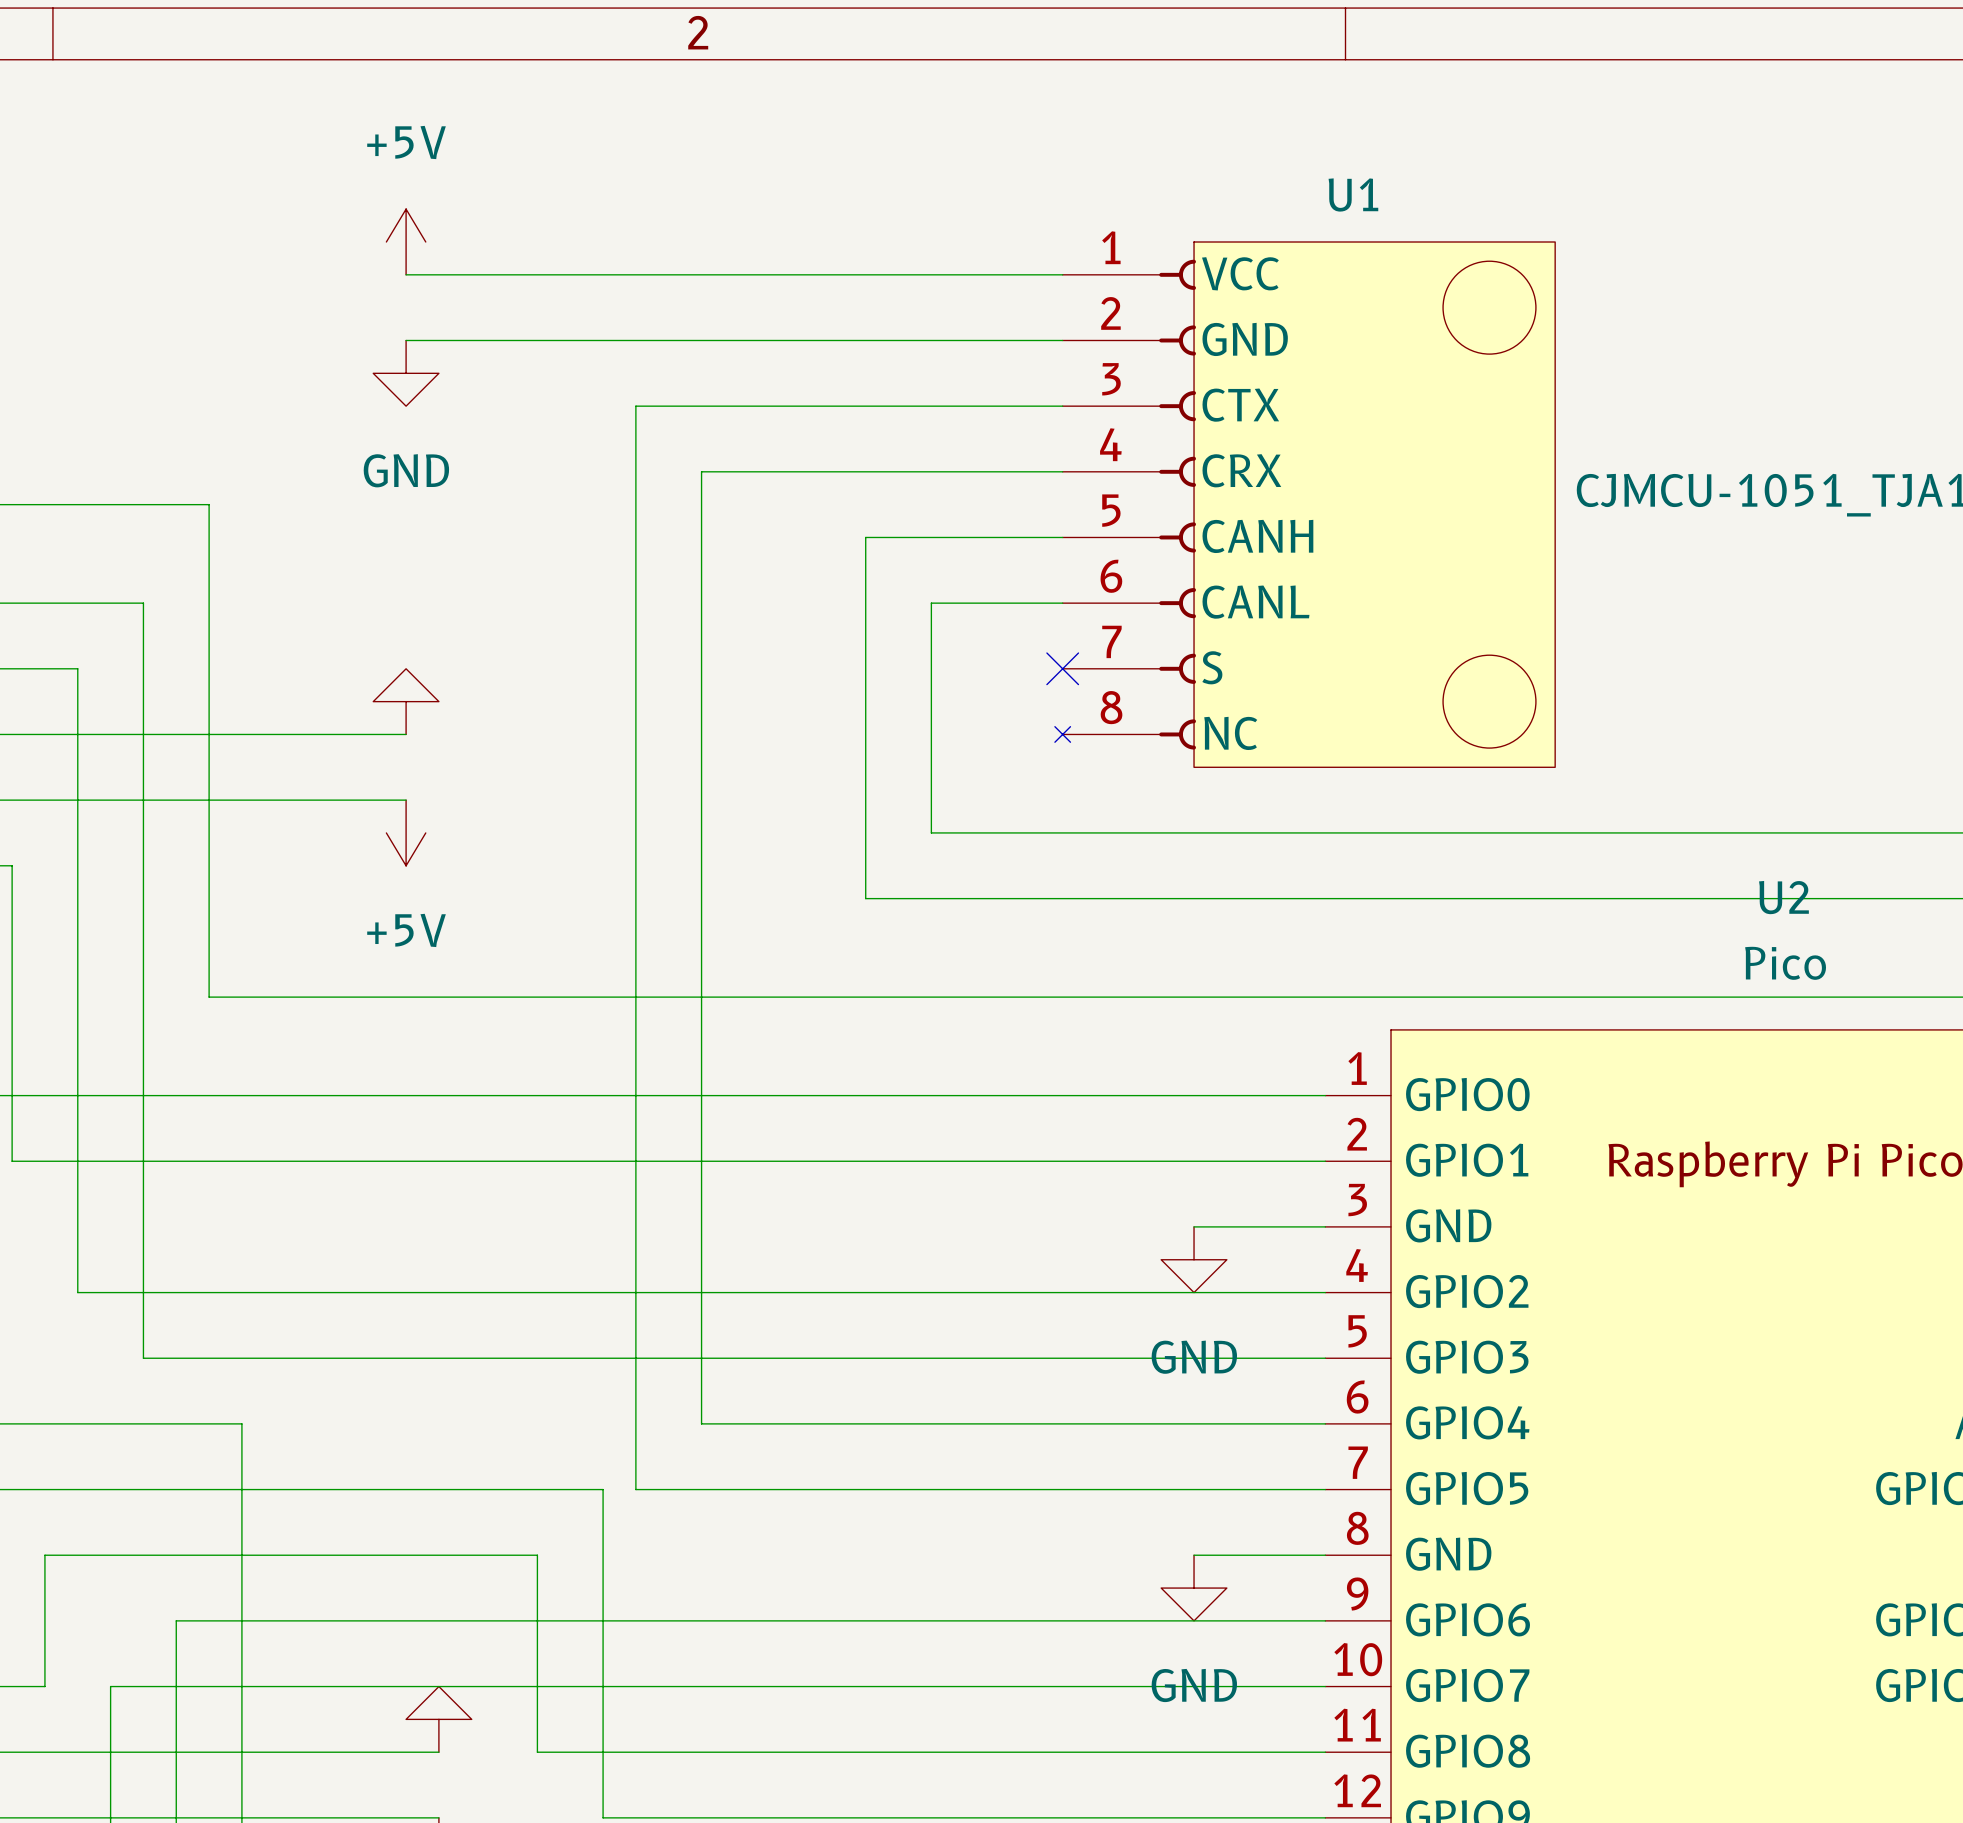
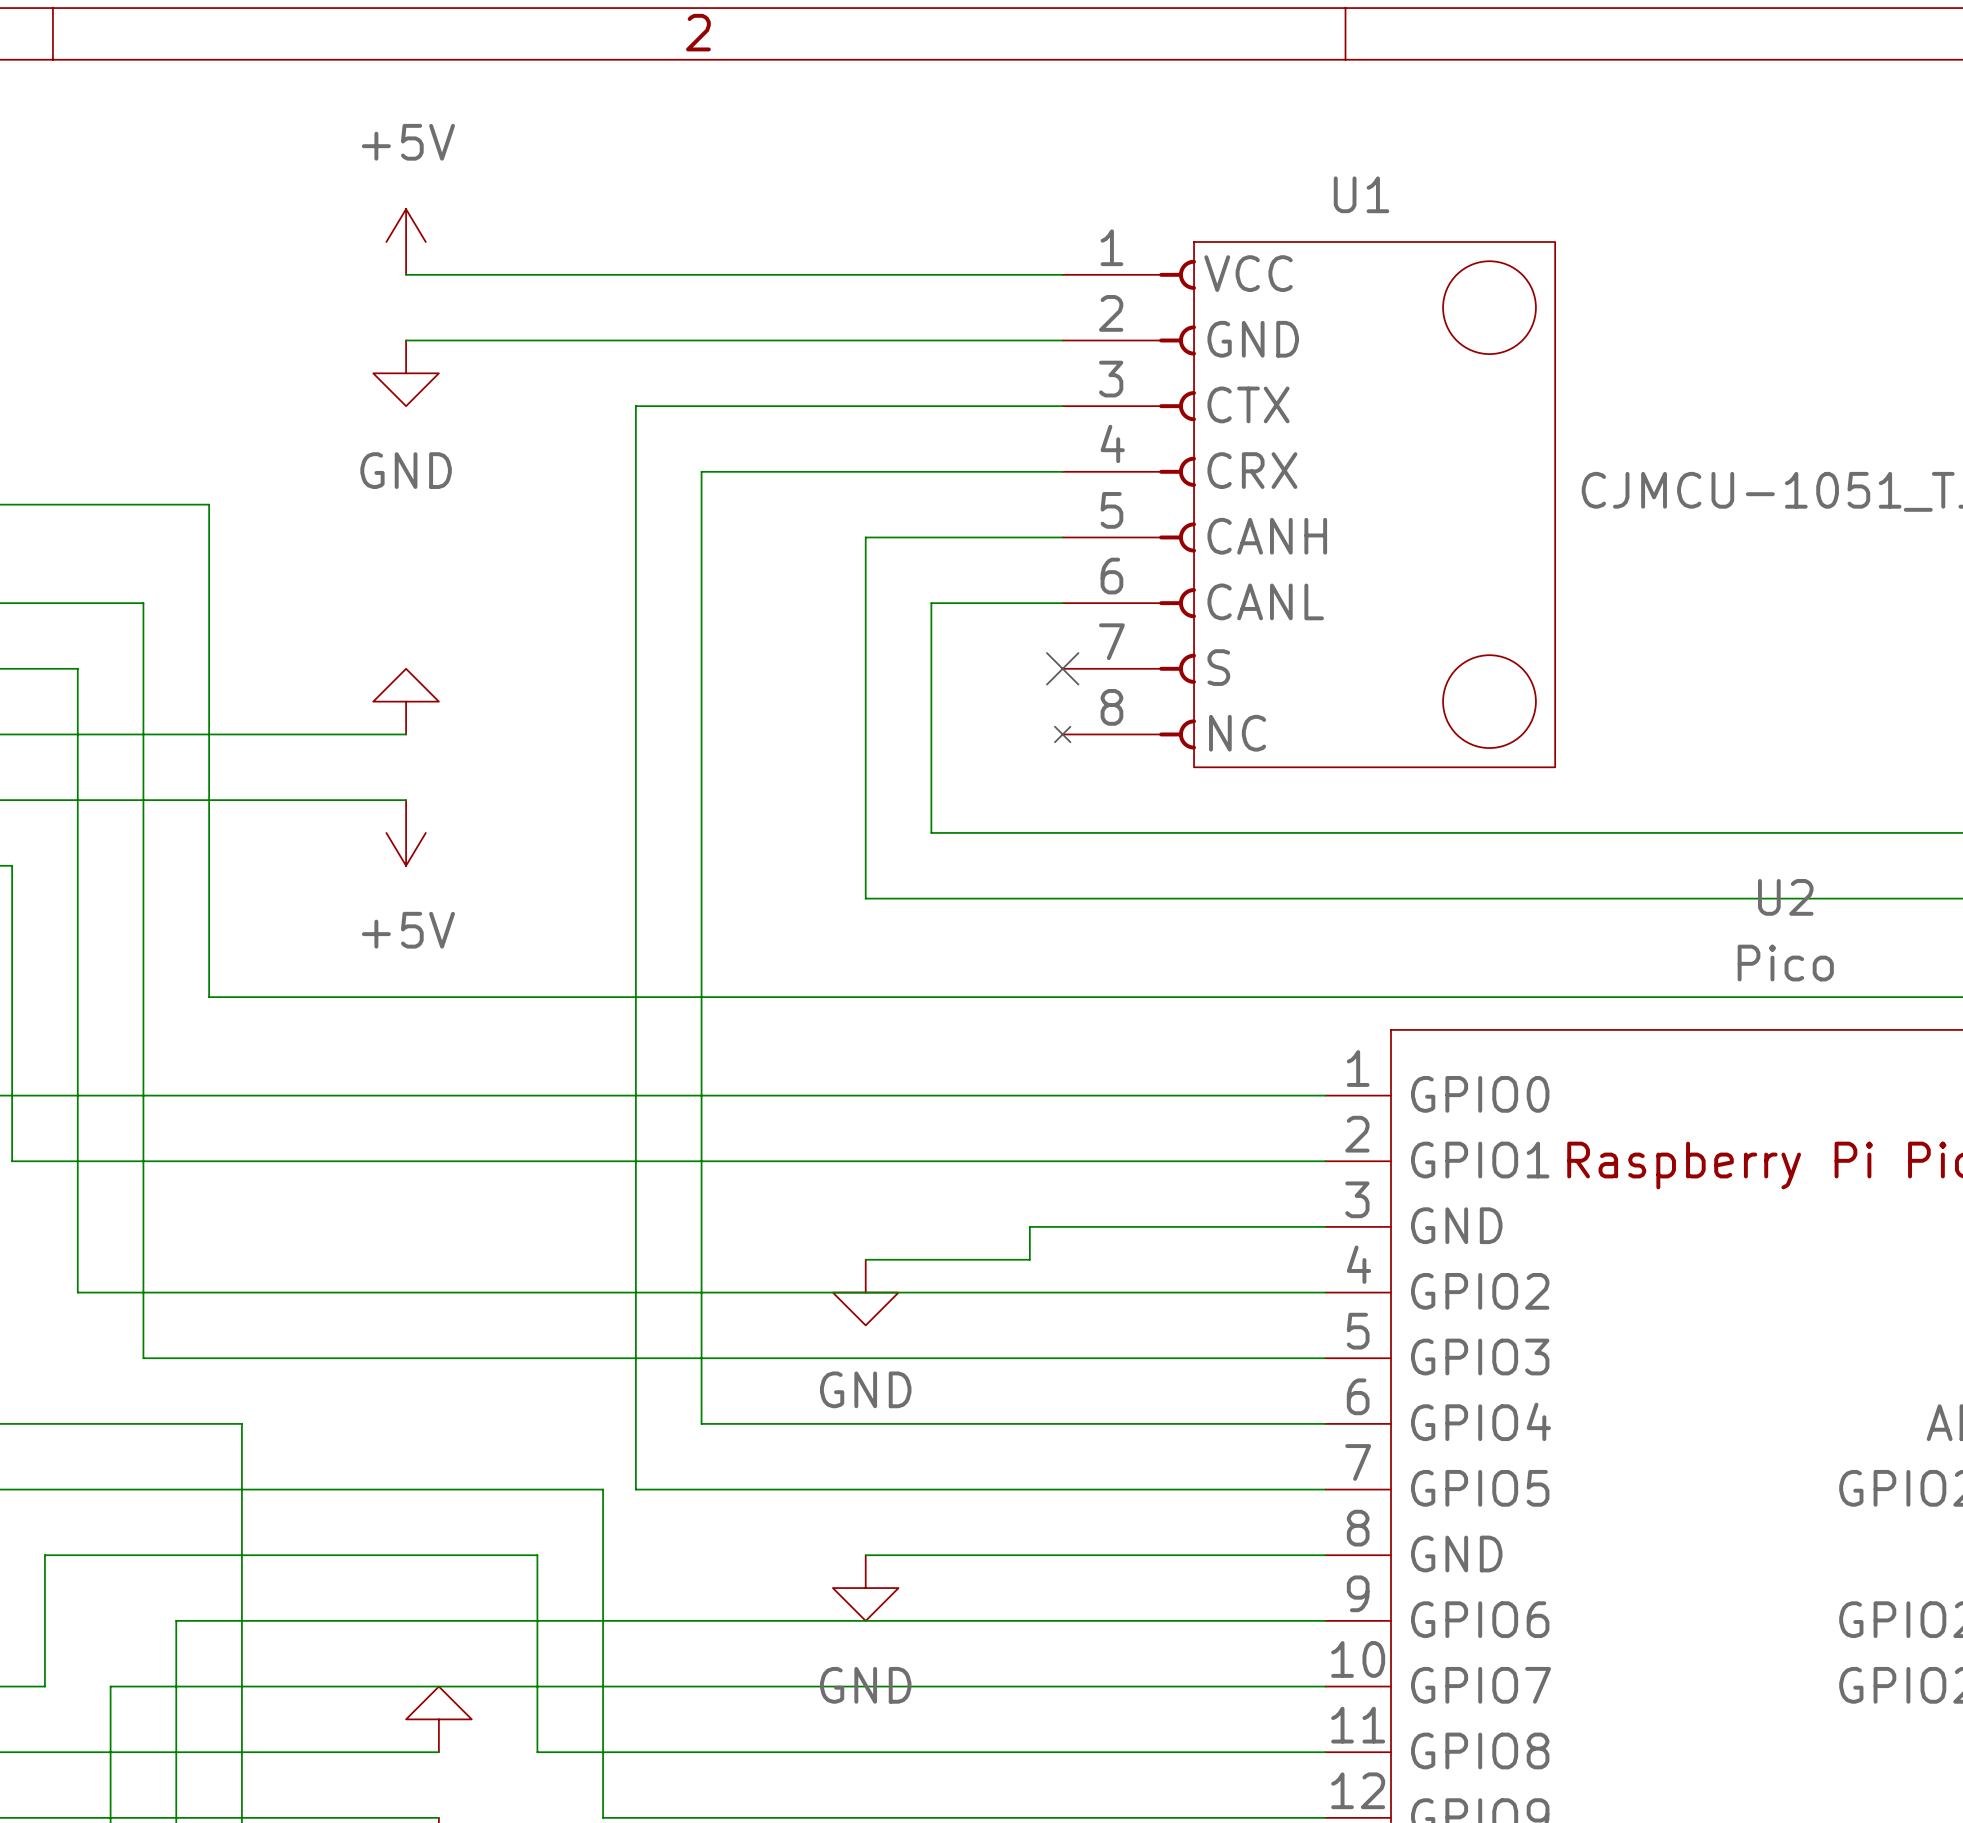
wire: none -> (1194, 1226) (1029, 1226) (1029, 1259) (865, 1259)
power symbol: GND (1194, 1259) -> none
power symbol: none -> GND (865, 1292)
wire: none -> (865, 1555) (1194, 1555)
power symbol: none -> GND (865, 1588)
power symbol: GND (1194, 1588) -> none

